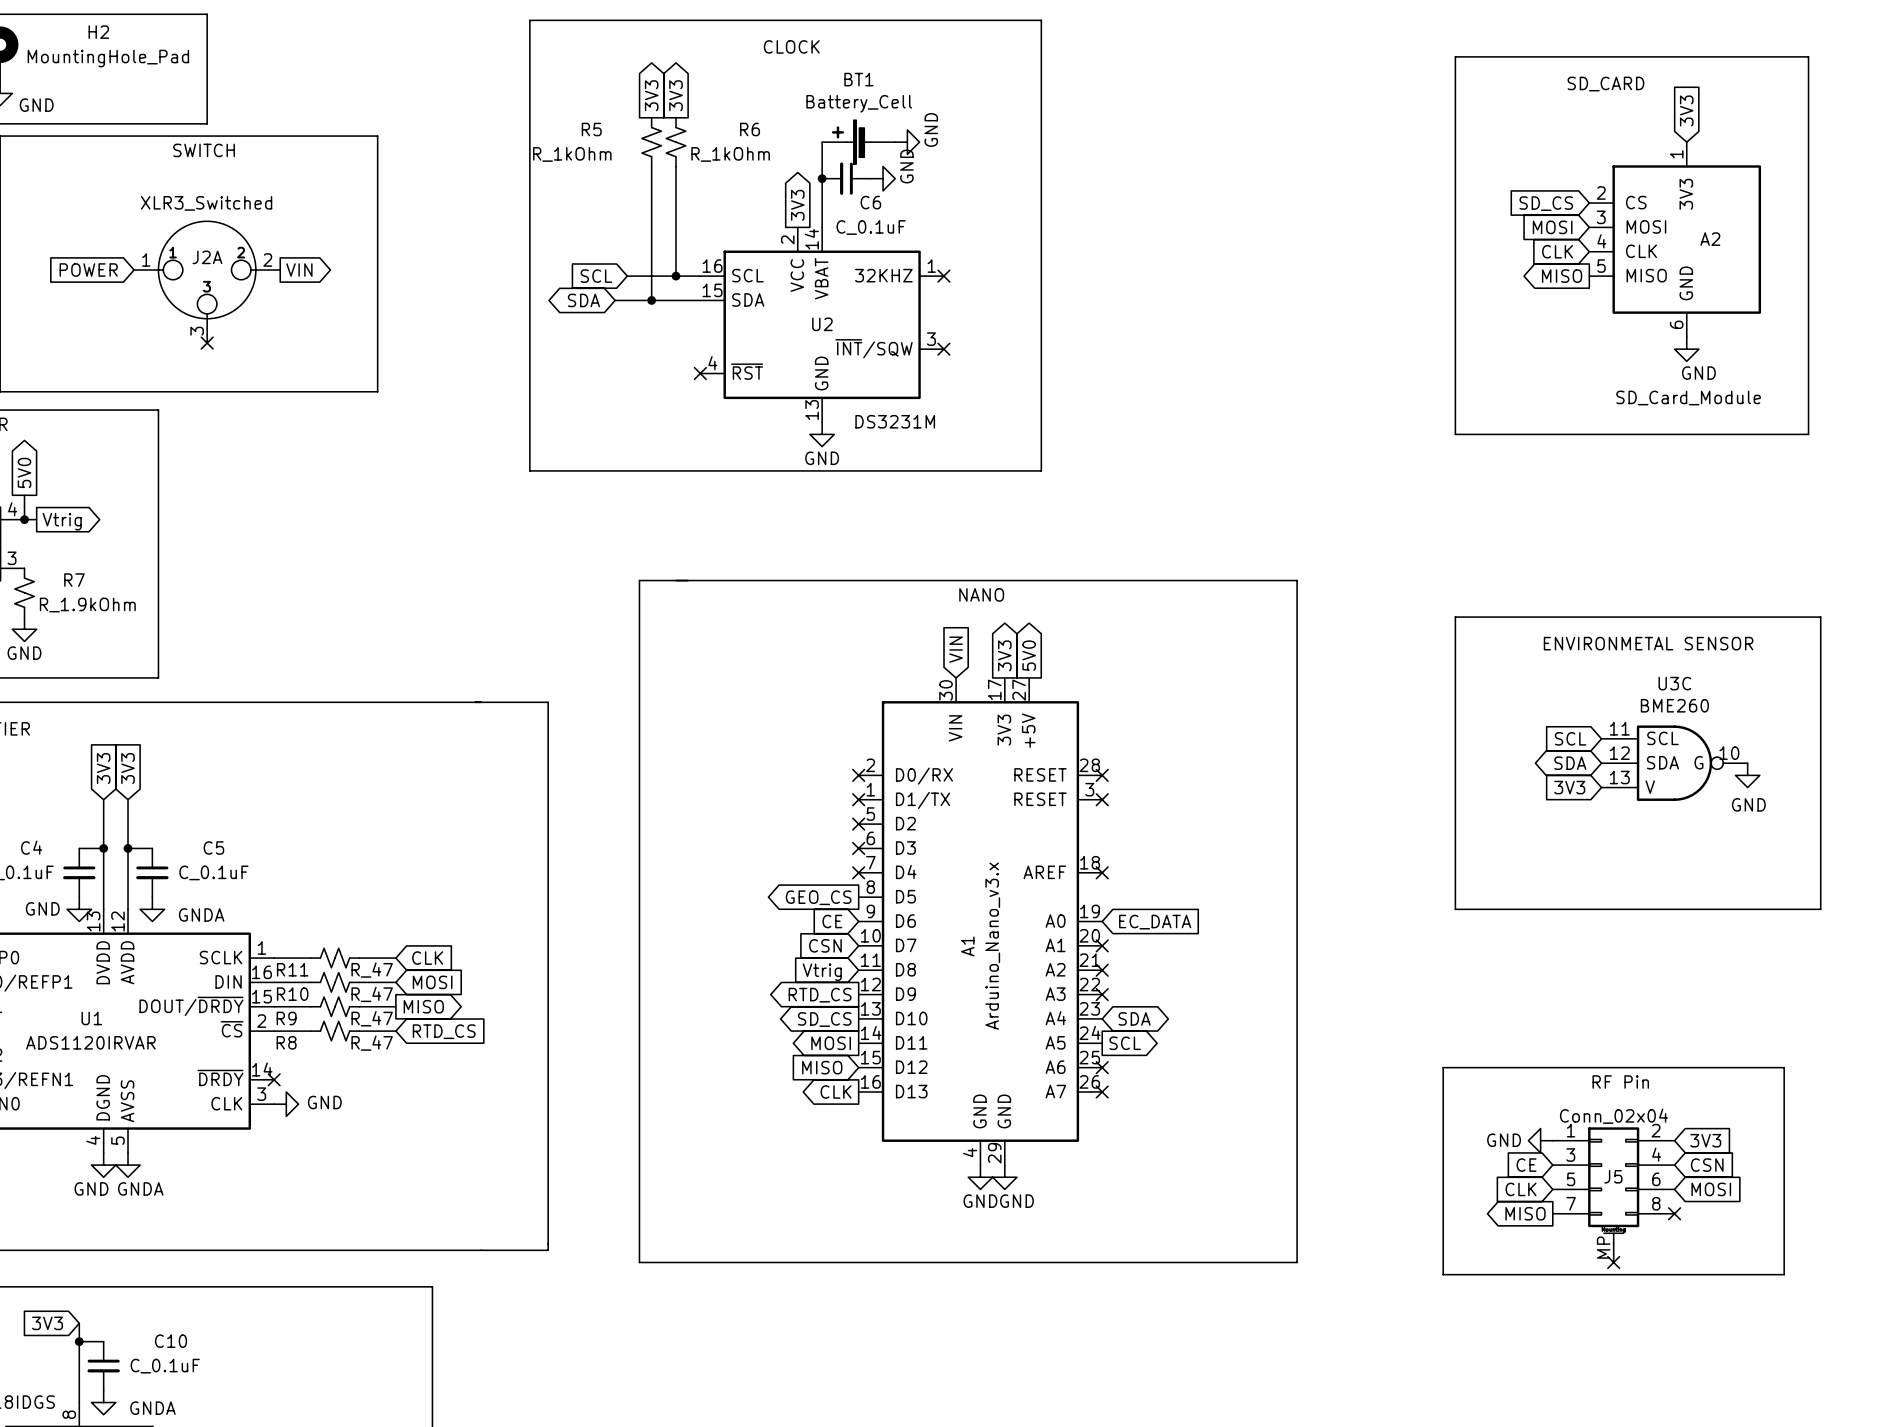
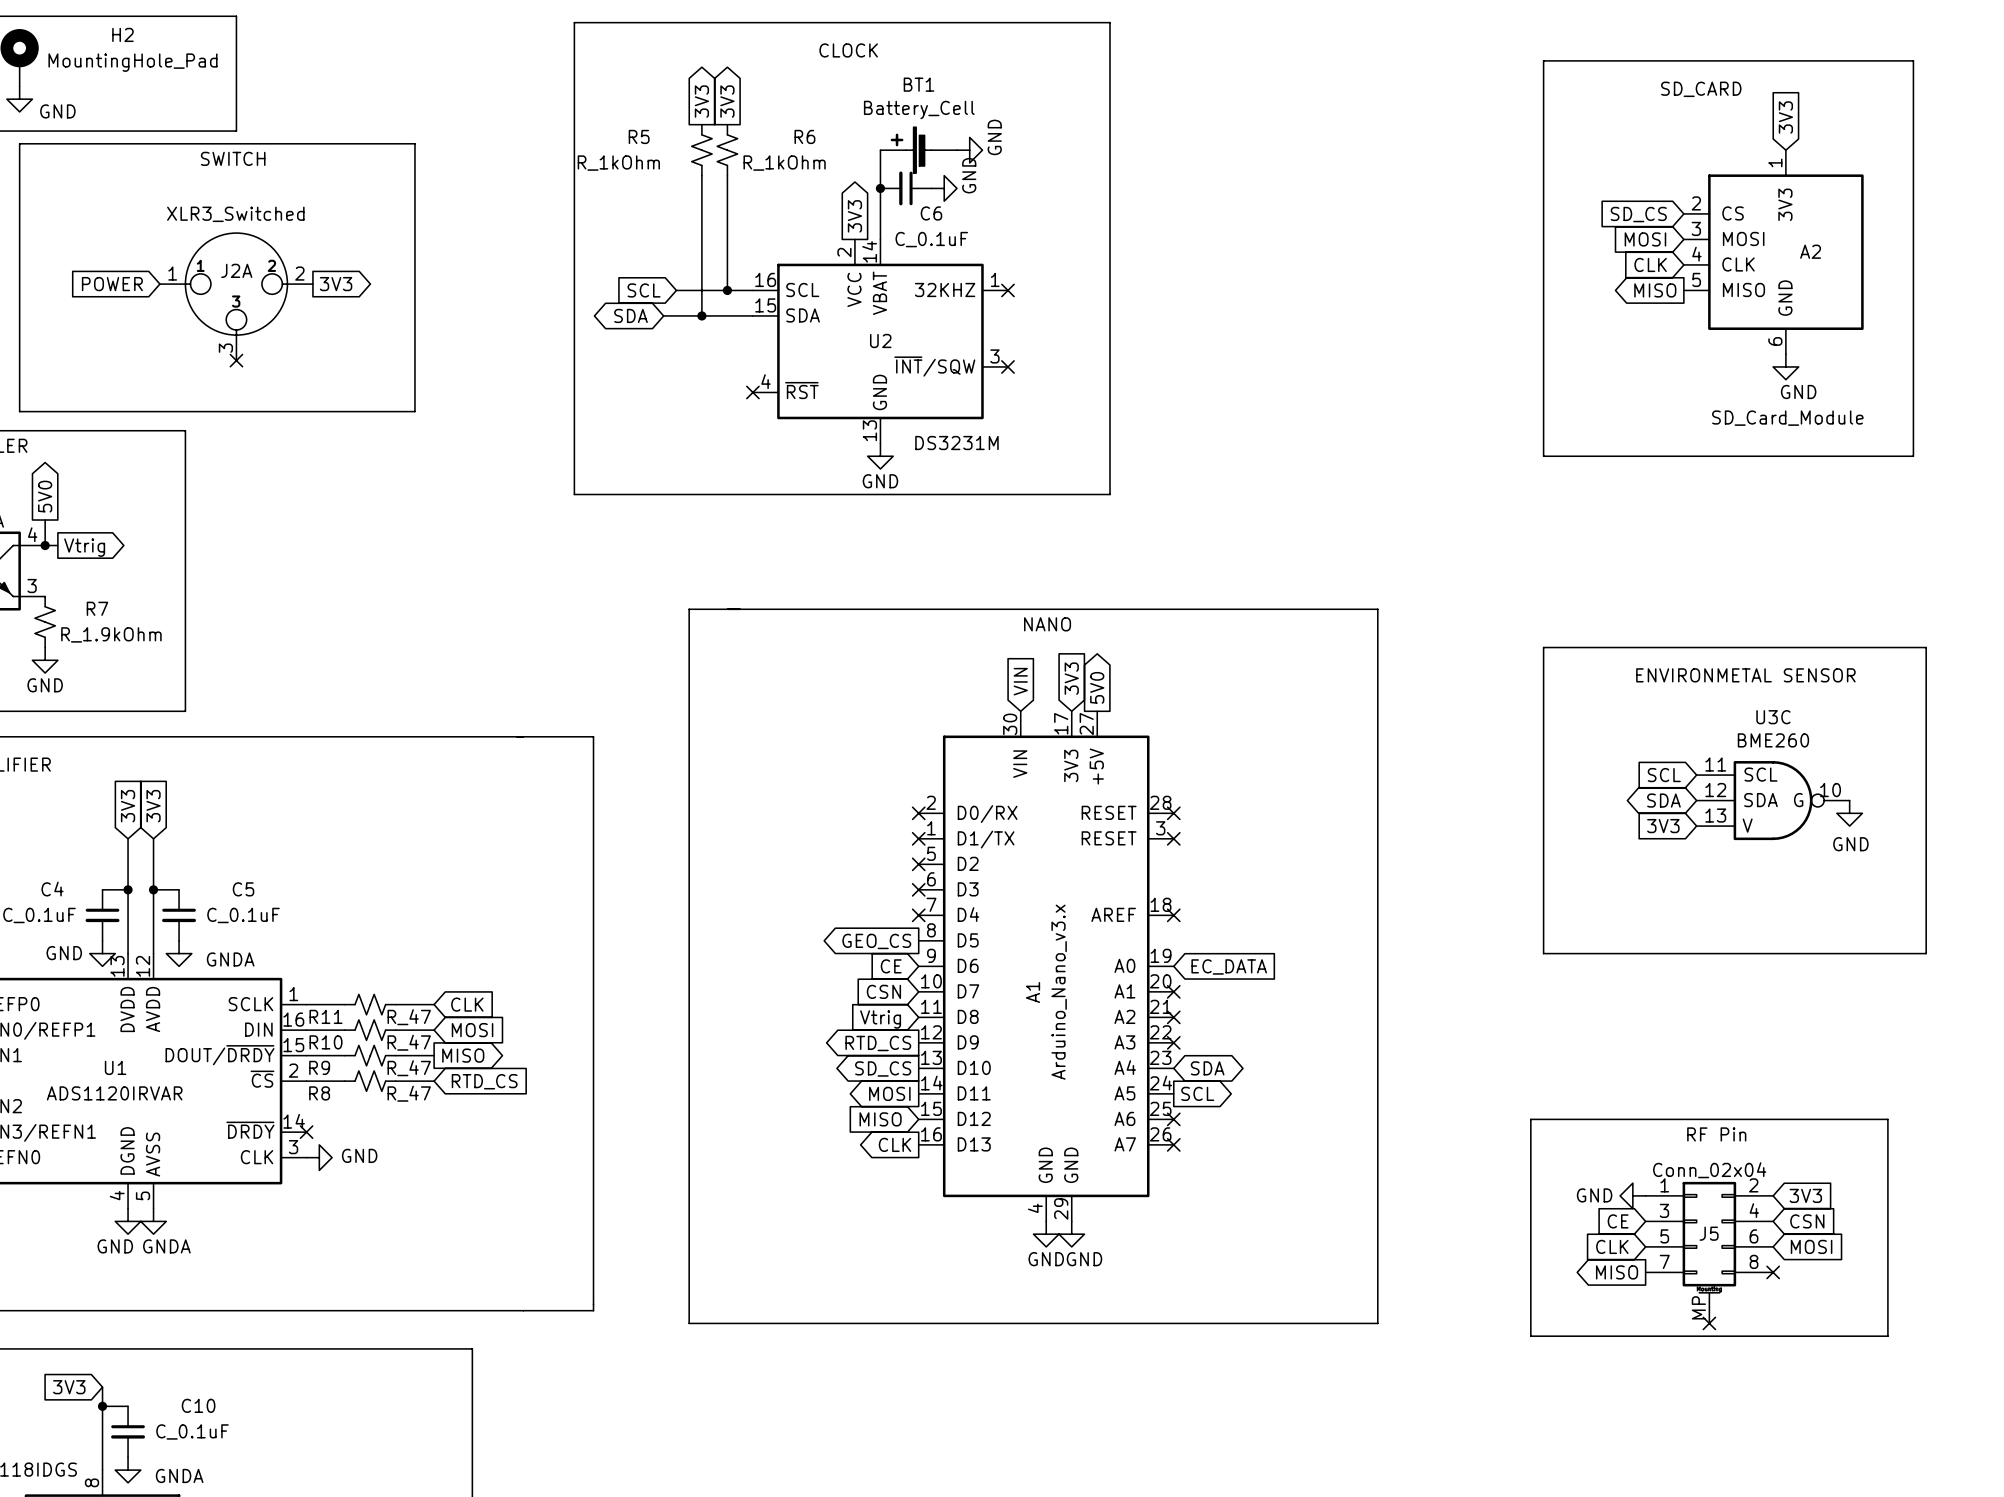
global label: VIN (299, 270) -> 3V3 (336, 284)
global label shape: output (1004, 655) -> input (1071, 678)

